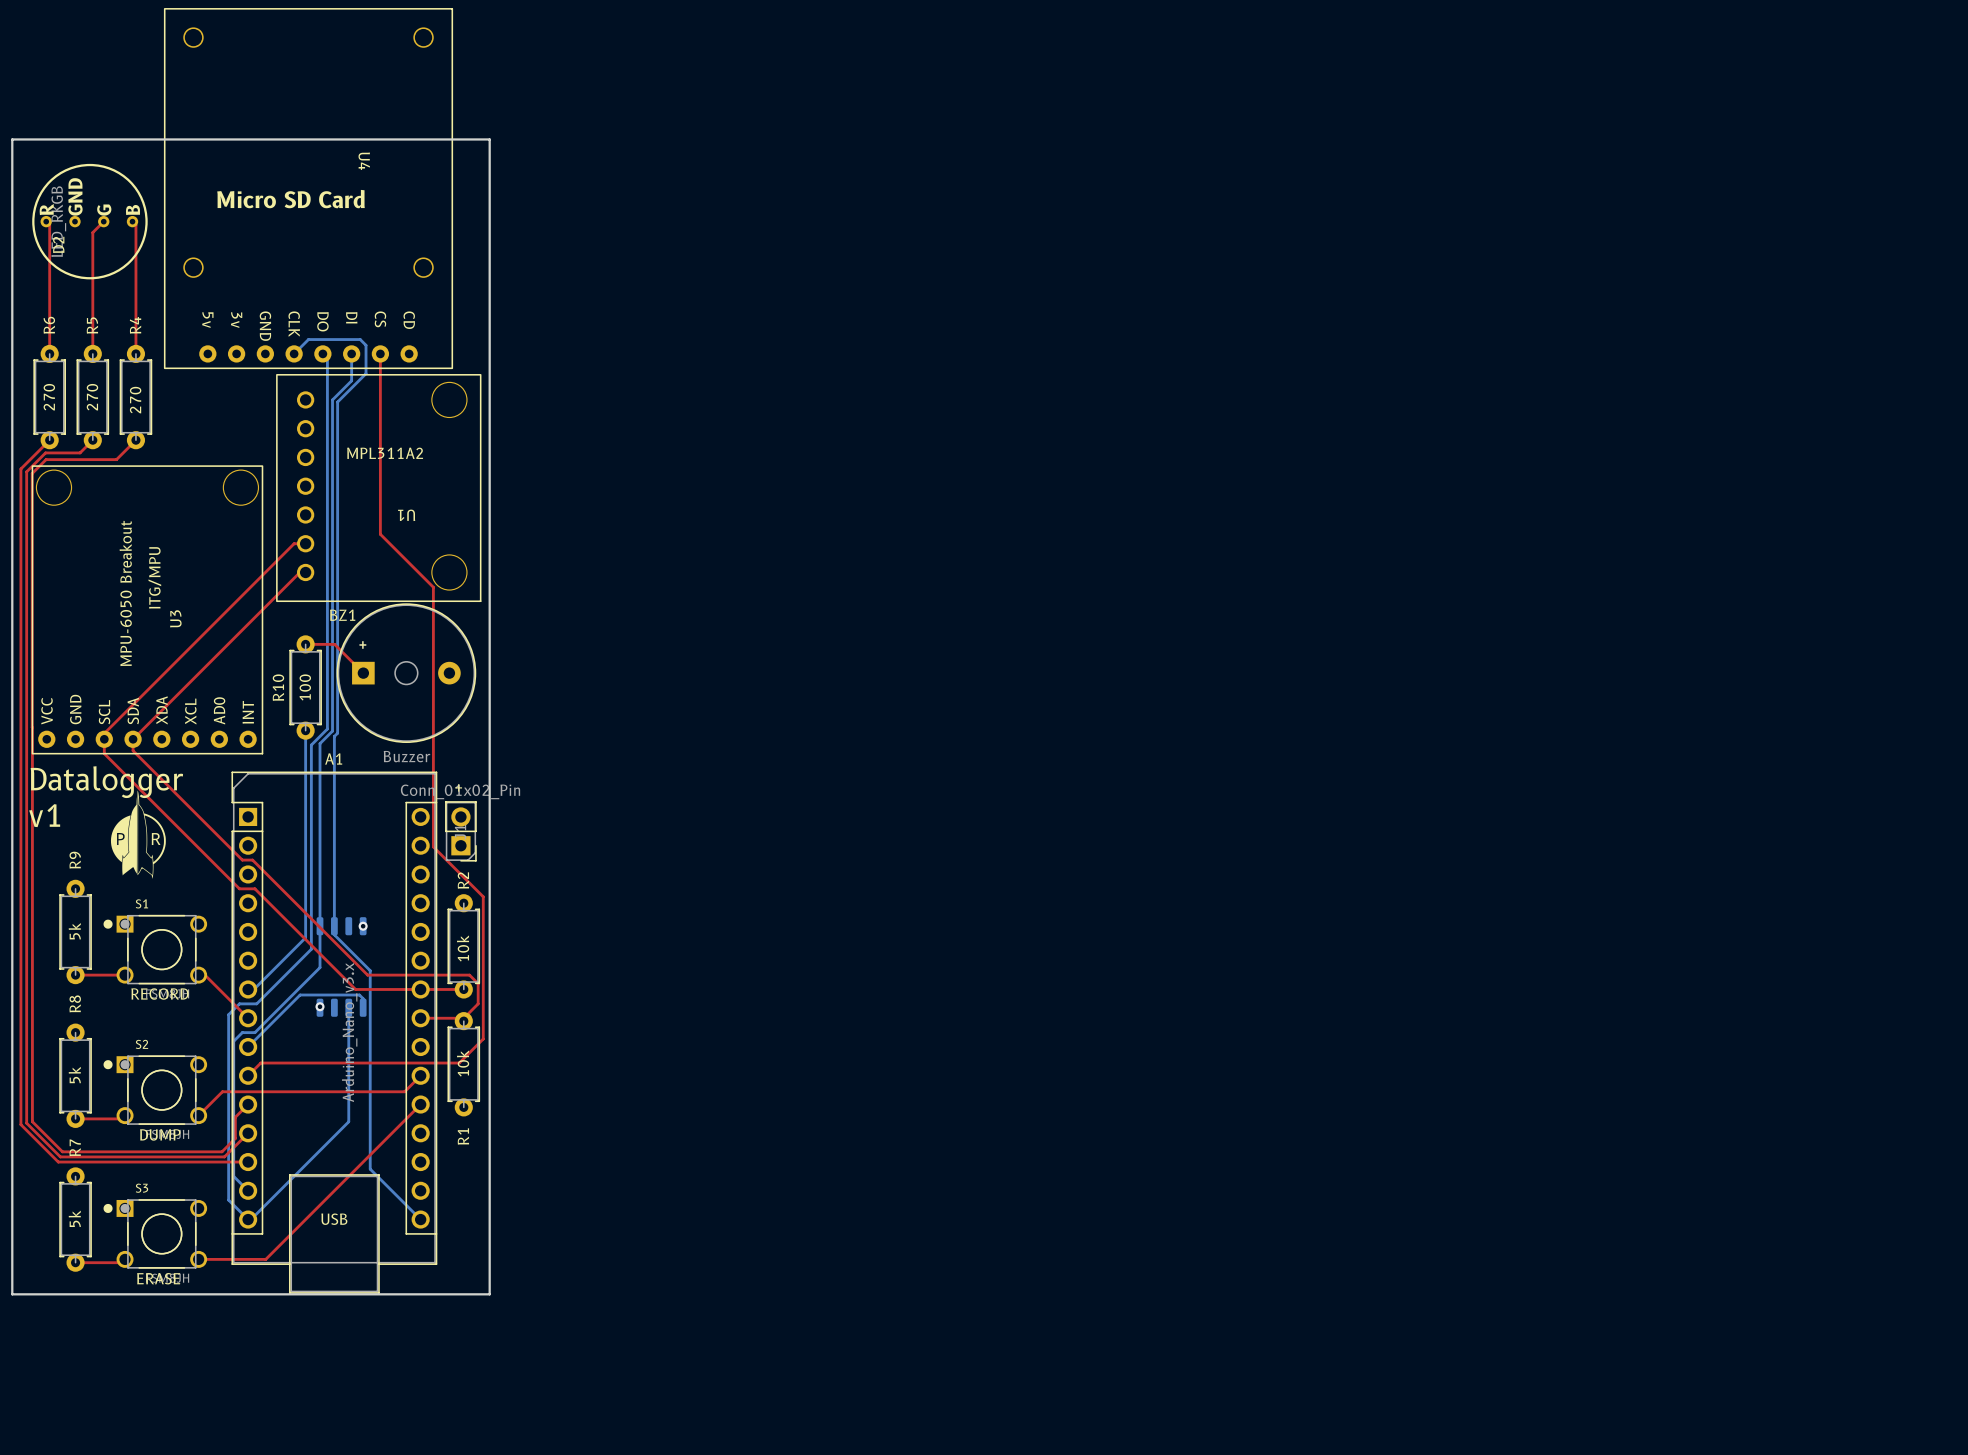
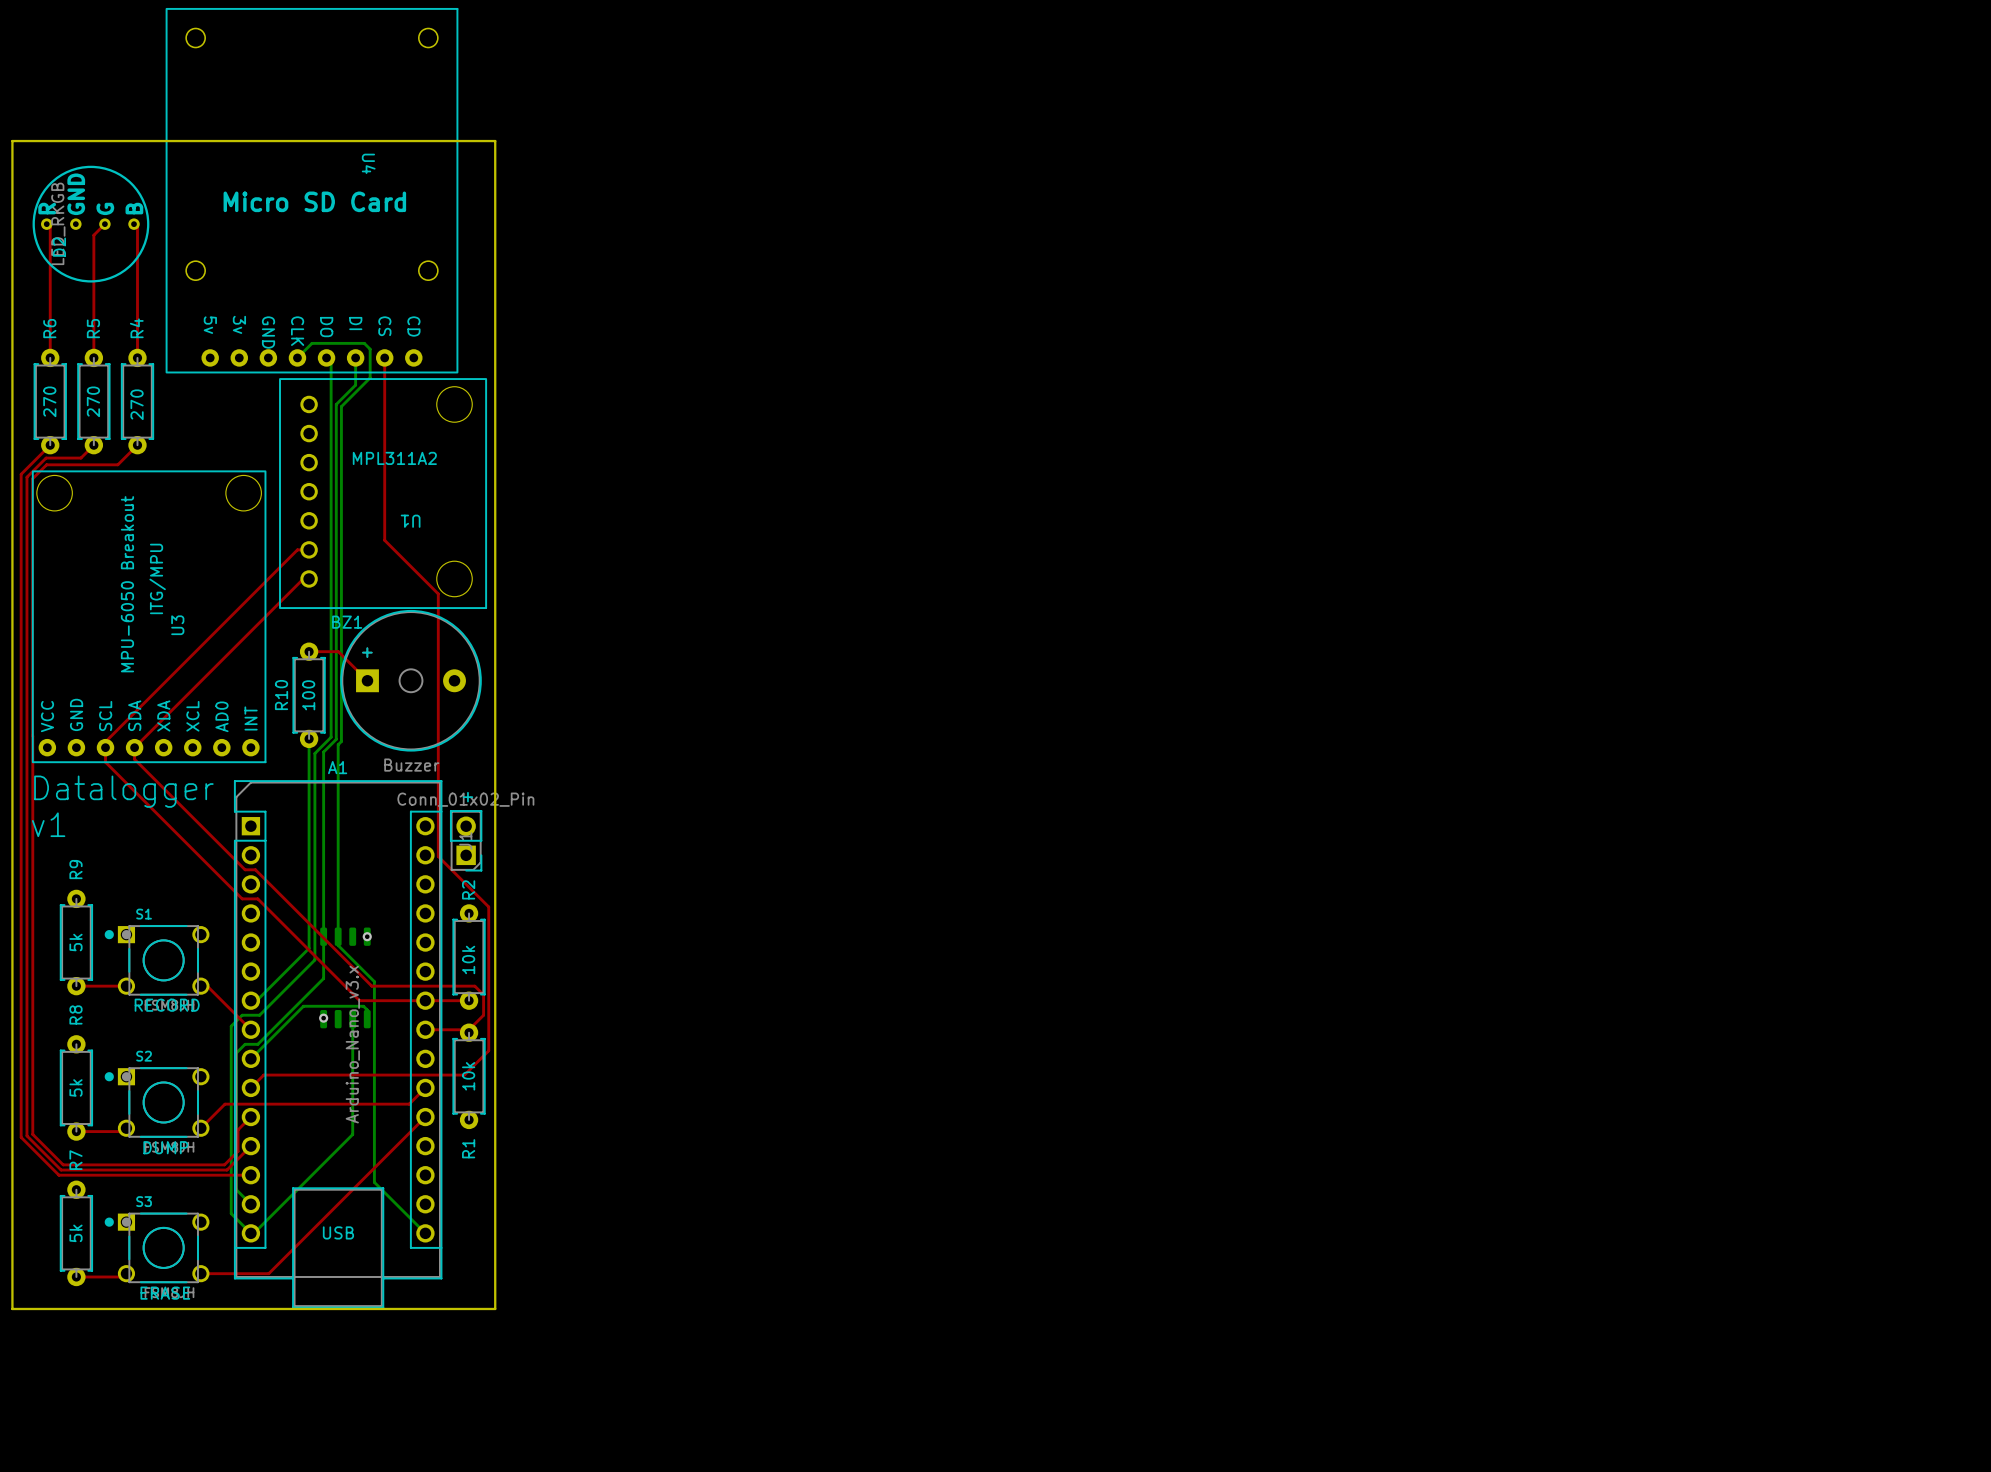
drawing: [110, 790, 166, 879] -> none

